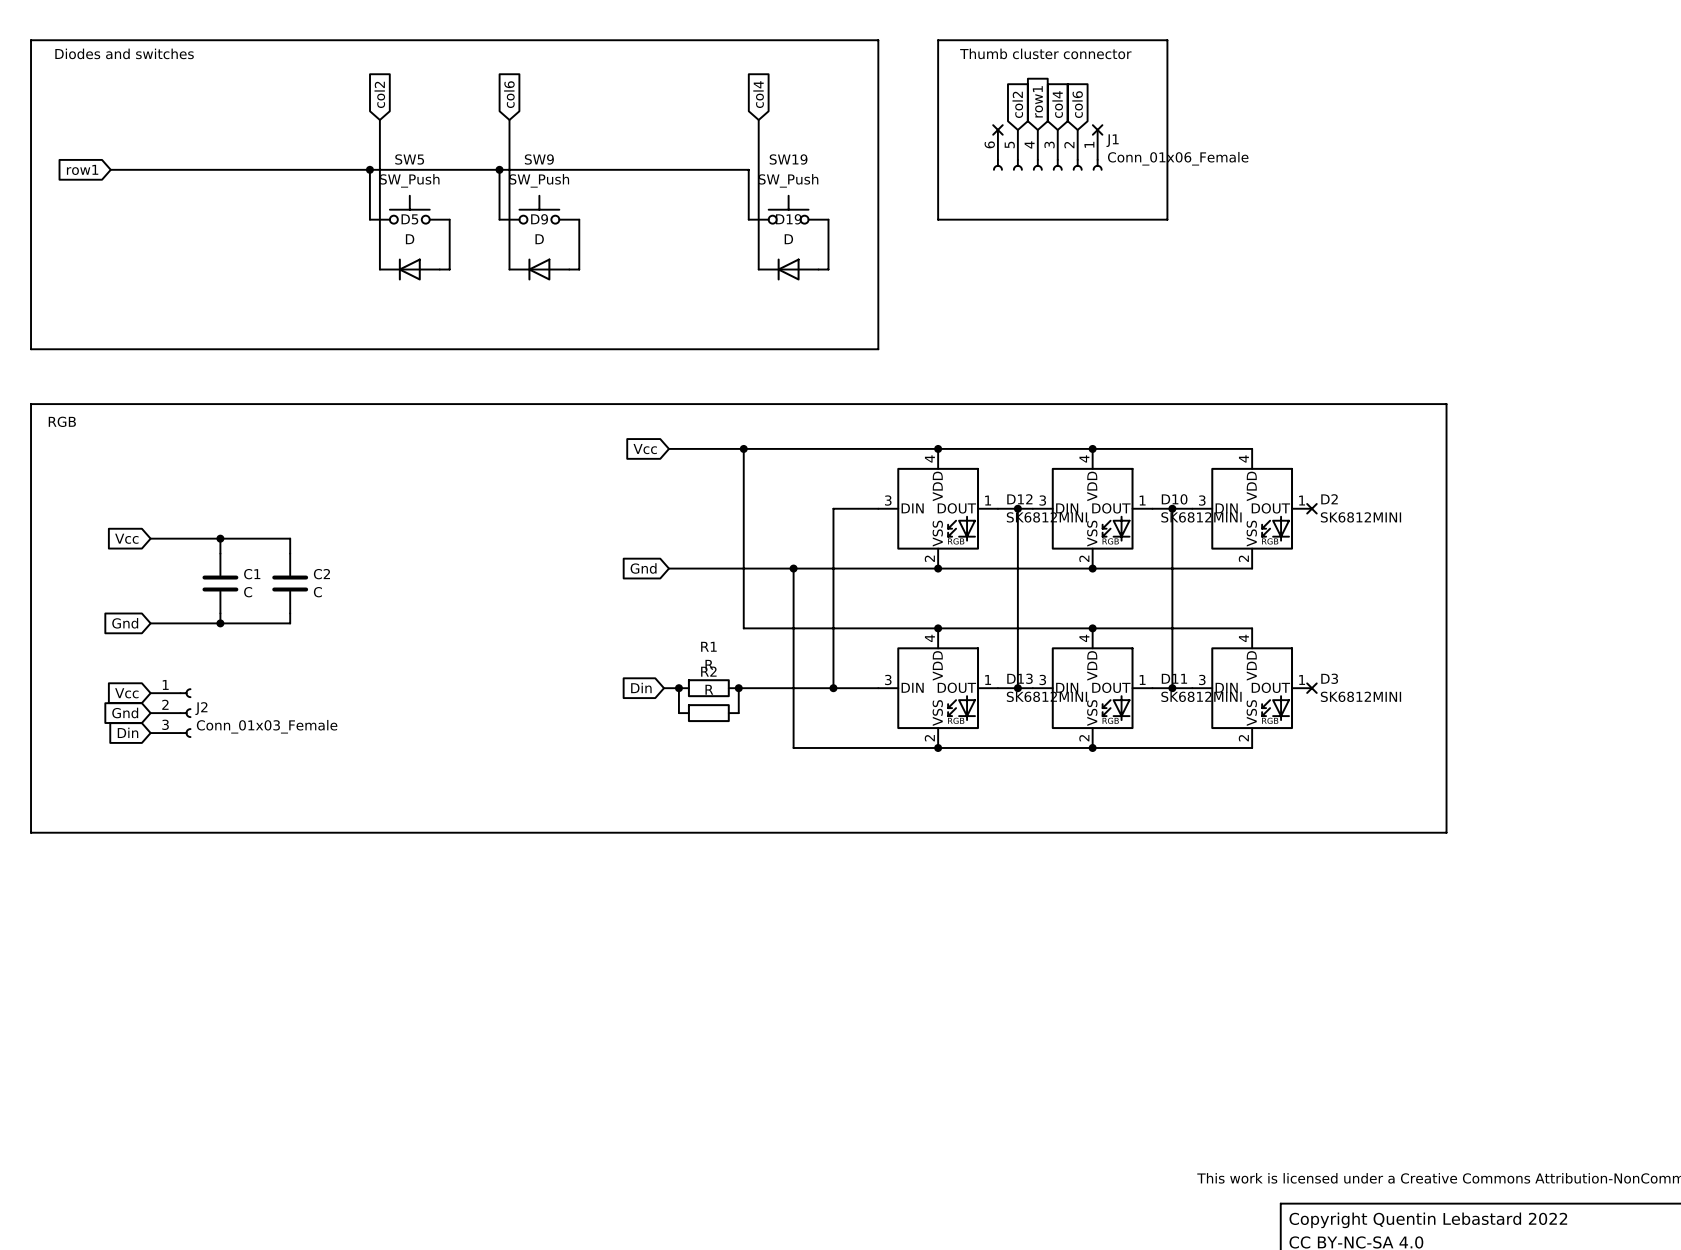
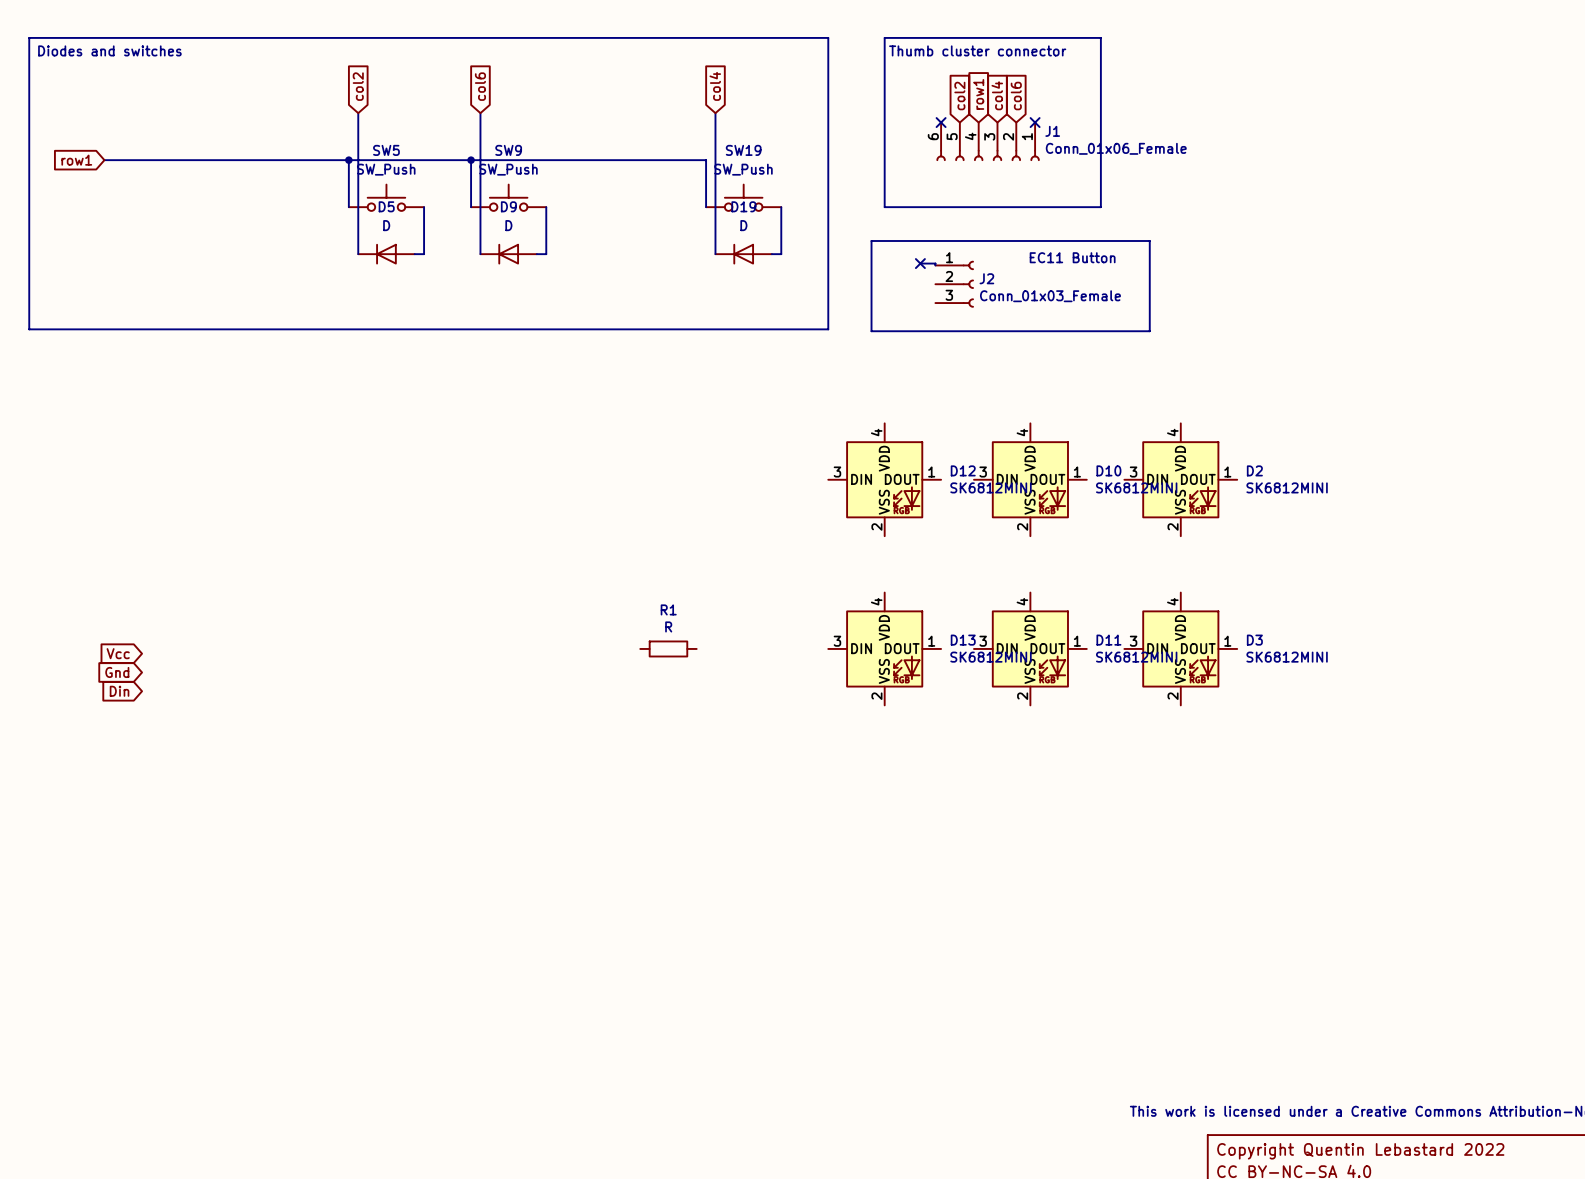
line: none -> (871, 240) (1149, 240) (1149, 331) (871, 331) (871, 240)
text: none -> EC11 Button (1072, 257)
wire: none -> (920, 263) (935, 263) (935, 265)
no-connect mark: none -> (920, 263)
line: (31, 404) (31, 832) (1446, 832) (1446, 404) (31, 404) -> none
text: RGB (62, 421) -> none
wire: (668, 448) (1252, 448) -> none
wire: (743, 448) (743, 628) (1252, 628) -> none
junction: (743, 448) -> none
junction: (938, 448) -> none
junction: (1092, 448) -> none
global label: Vcc (645, 449) -> none
wire: (878, 508) (833, 508) (833, 688) -> none
wire: (997, 508) (1032, 508) -> none
wire: (1017, 508) (1017, 688) -> none
junction: (1017, 508) -> none
wire: (1152, 508) (1192, 508) -> none
wire: (1172, 508) (1172, 688) -> none
junction: (1172, 508) -> none
no-connect mark: (1311, 508) -> none
global label: Vcc (126, 538) -> none
wire: (150, 538) (290, 538) (290, 553) -> none
wire: (220, 538) (220, 553) -> none
junction: (220, 538) -> none
global label: Gnd (643, 568) -> none
wire: (668, 568) (1252, 568) -> none
wire: (793, 568) (793, 747) (1252, 747) -> none
junction: (793, 568) -> none
junction: (938, 568) -> none
junction: (1092, 568) -> none
C1: C (220, 583) -> none
C2: C (290, 583) -> none
wire: (220, 613) (220, 623) -> none
wire: (290, 613) (290, 623) (150, 623) -> none
global label: Gnd (125, 623) -> none
junction: (220, 623) -> none
junction: (938, 628) -> none
junction: (1092, 628) -> none
global label: Din (641, 687) -> none
wire: (664, 688) (678, 688) (678, 713) -> none
junction: (678, 688) -> none
junction: (738, 688) -> none
junction: (833, 688) -> none
wire: (878, 688) (738, 688) (738, 713) -> none
wire: (997, 688) (1032, 688) -> none
junction: (1017, 688) -> none
wire: (1152, 688) (1192, 688) -> none
junction: (1172, 688) -> none
no-connect mark: (1311, 688) -> none
J2 position: (170, 713) -> (954, 284)
R2: R (708, 713) -> none
junction: (938, 747) -> none
junction: (1092, 747) -> none

